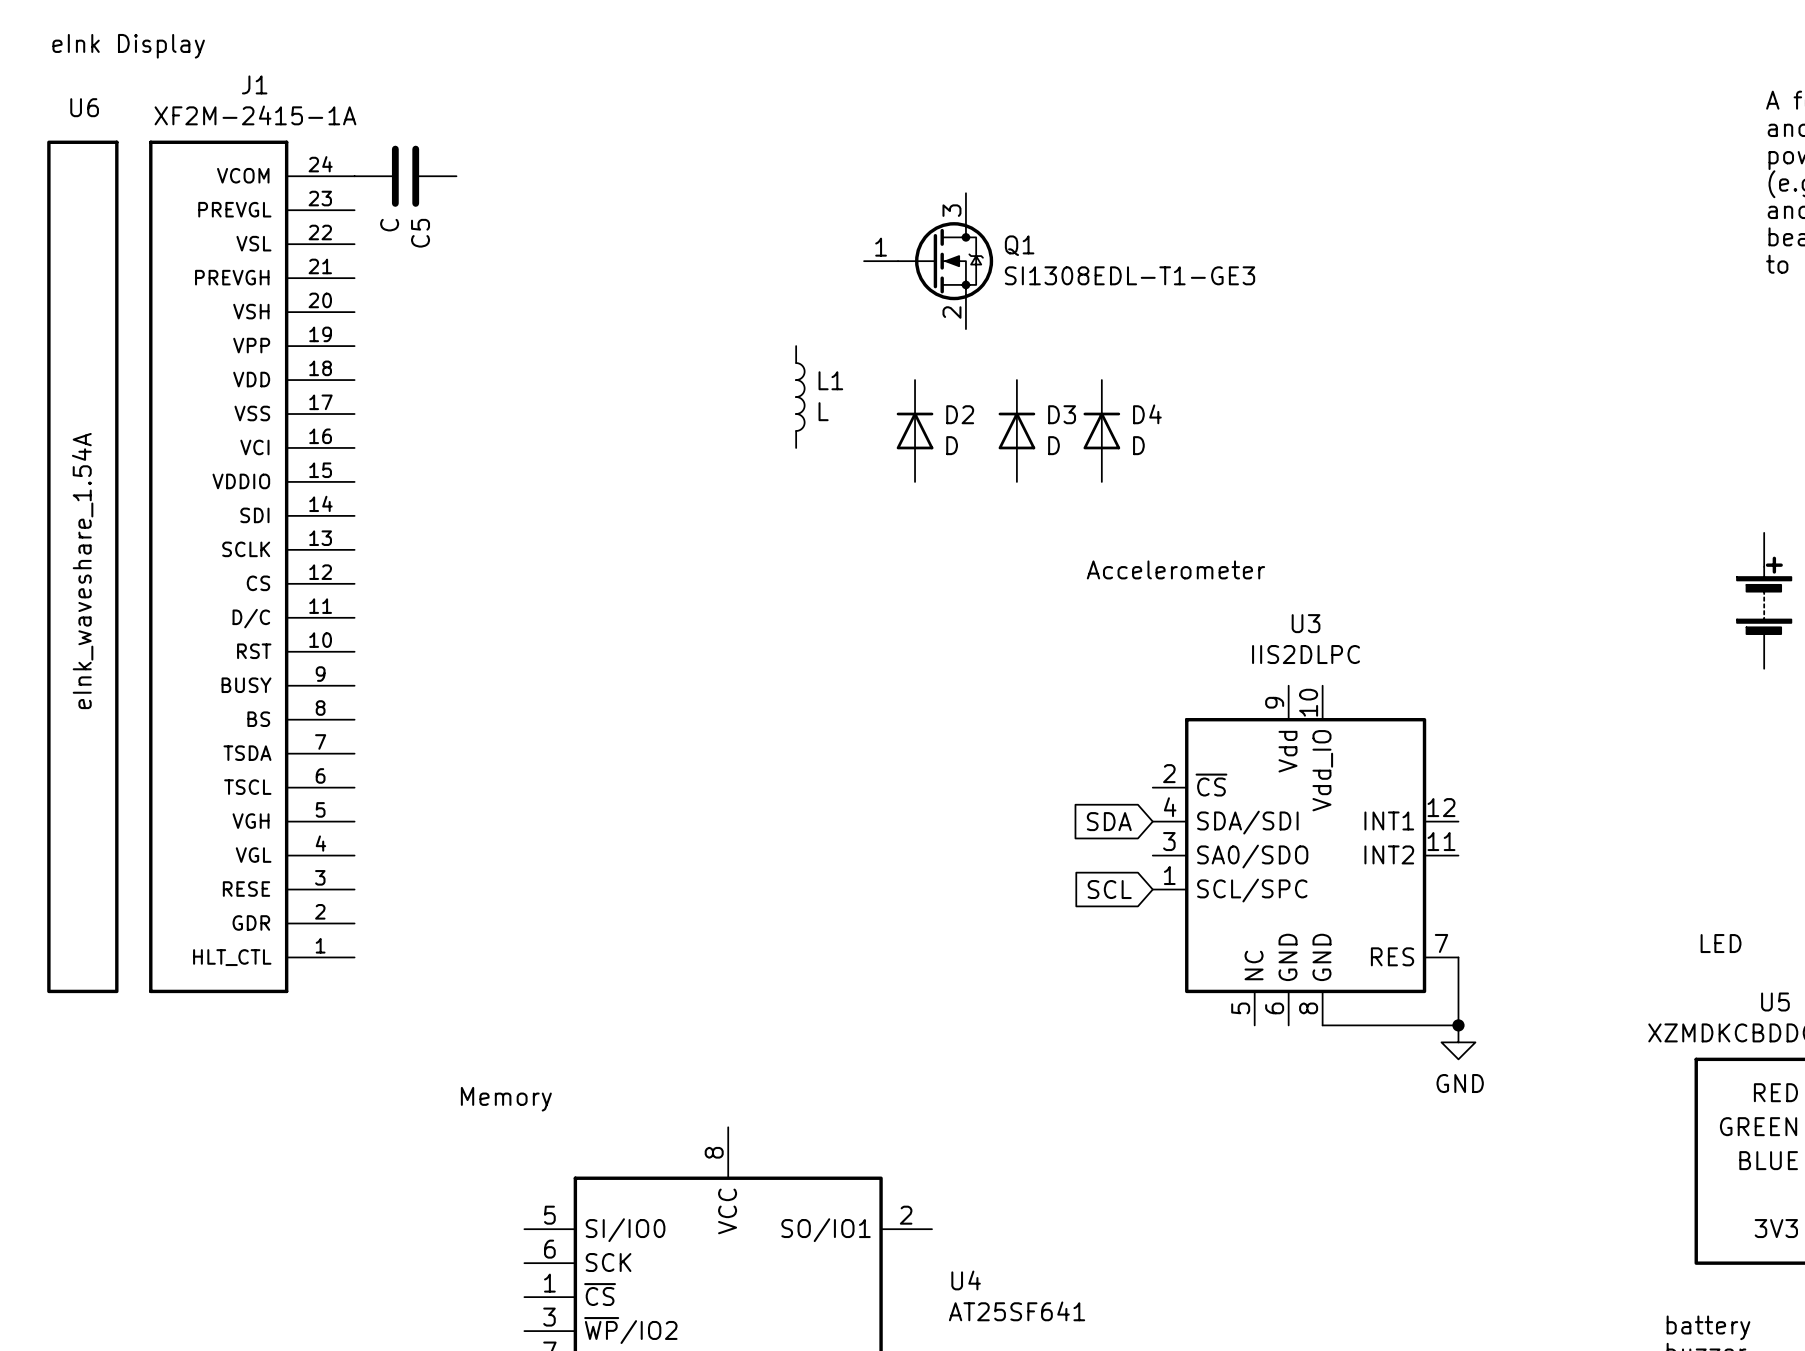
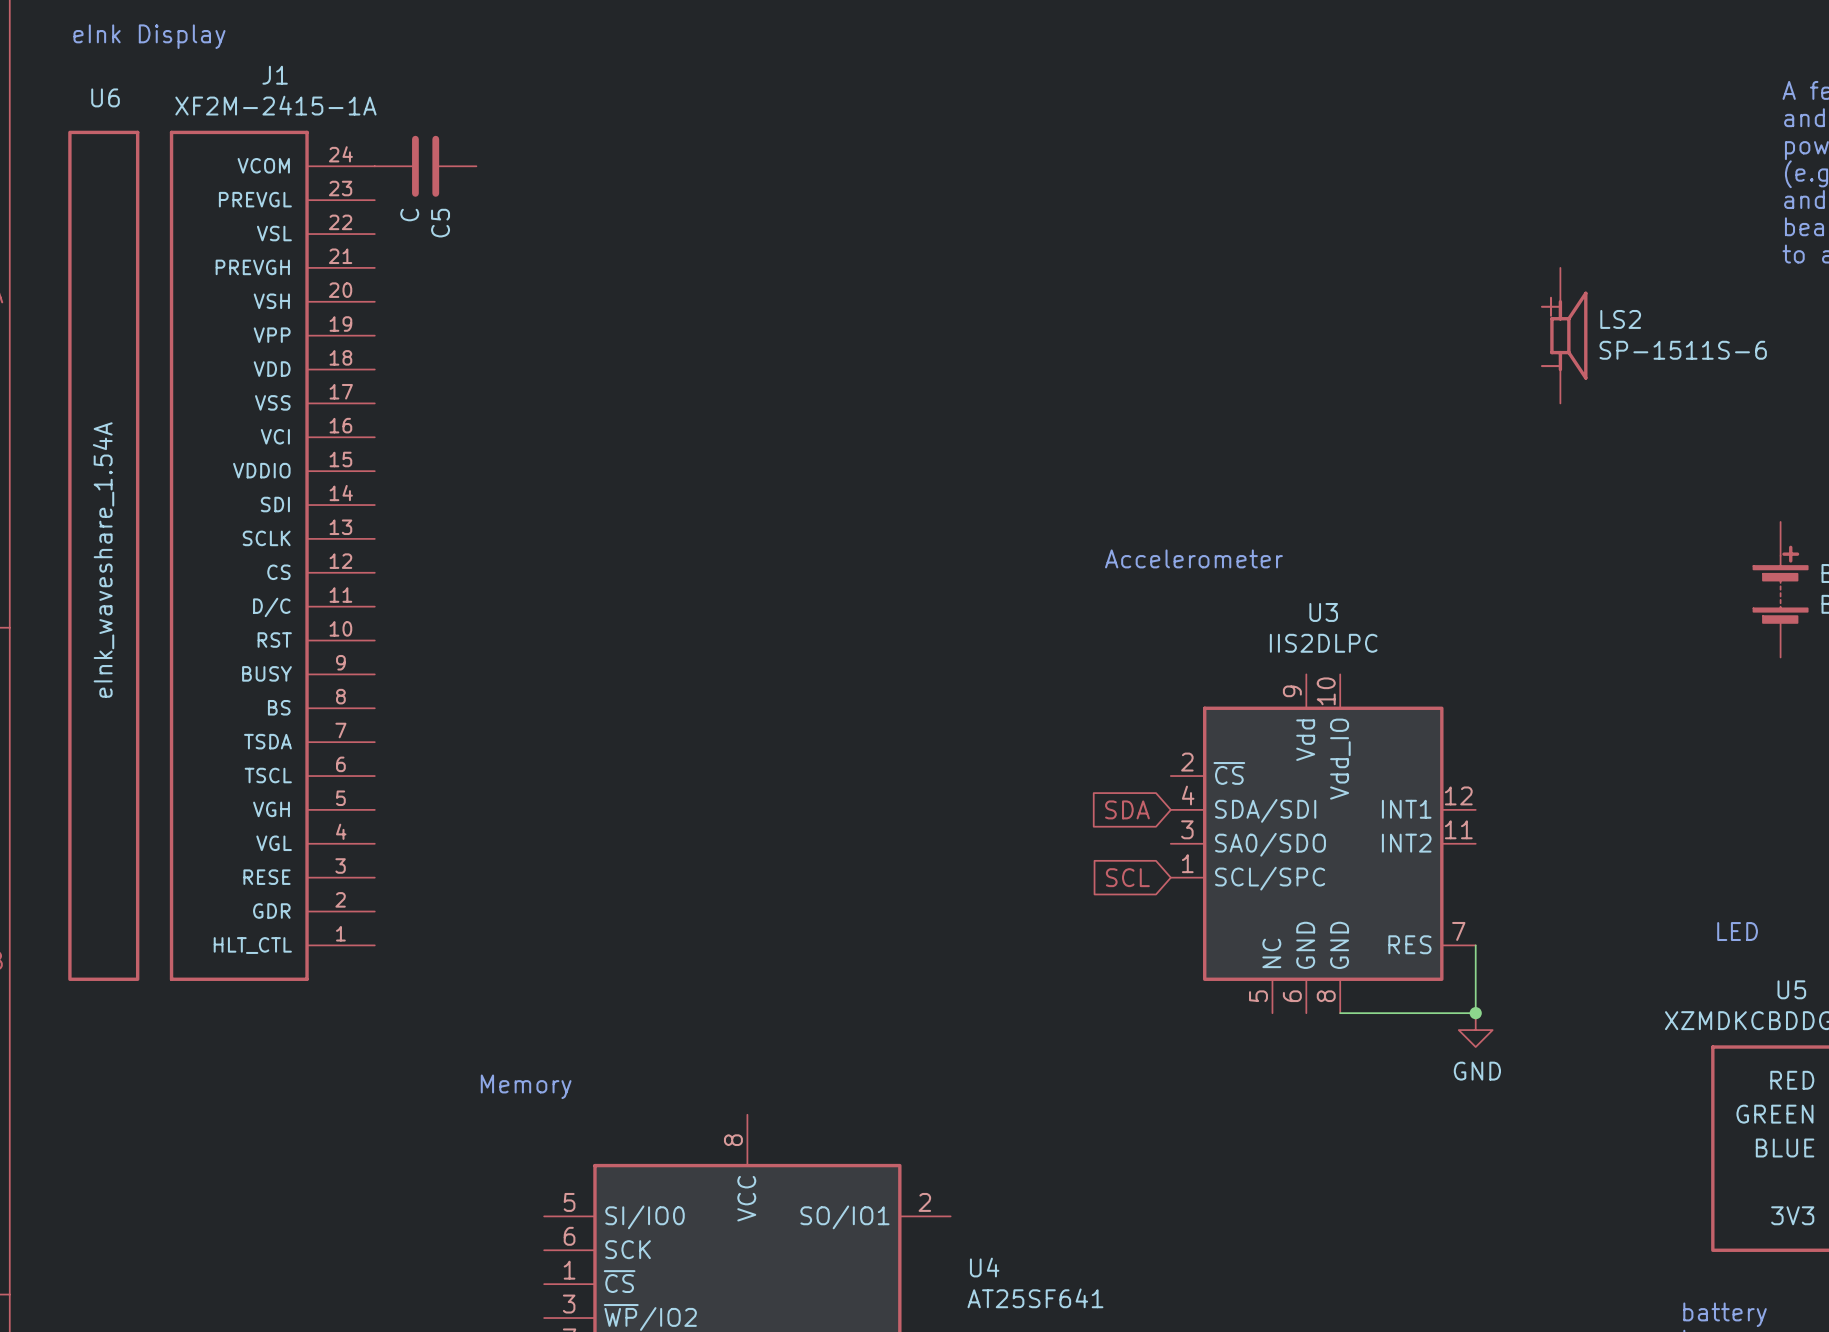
Q1: SI1308EDL-T1-GE3 (928, 261) -> none
LS2: none -> SP-1511S-6 (1568, 335)
L1: L (800, 397) -> none
D2: D (915, 430) -> none
D3: D (1016, 430) -> none
D4: D (1101, 430) -> none

